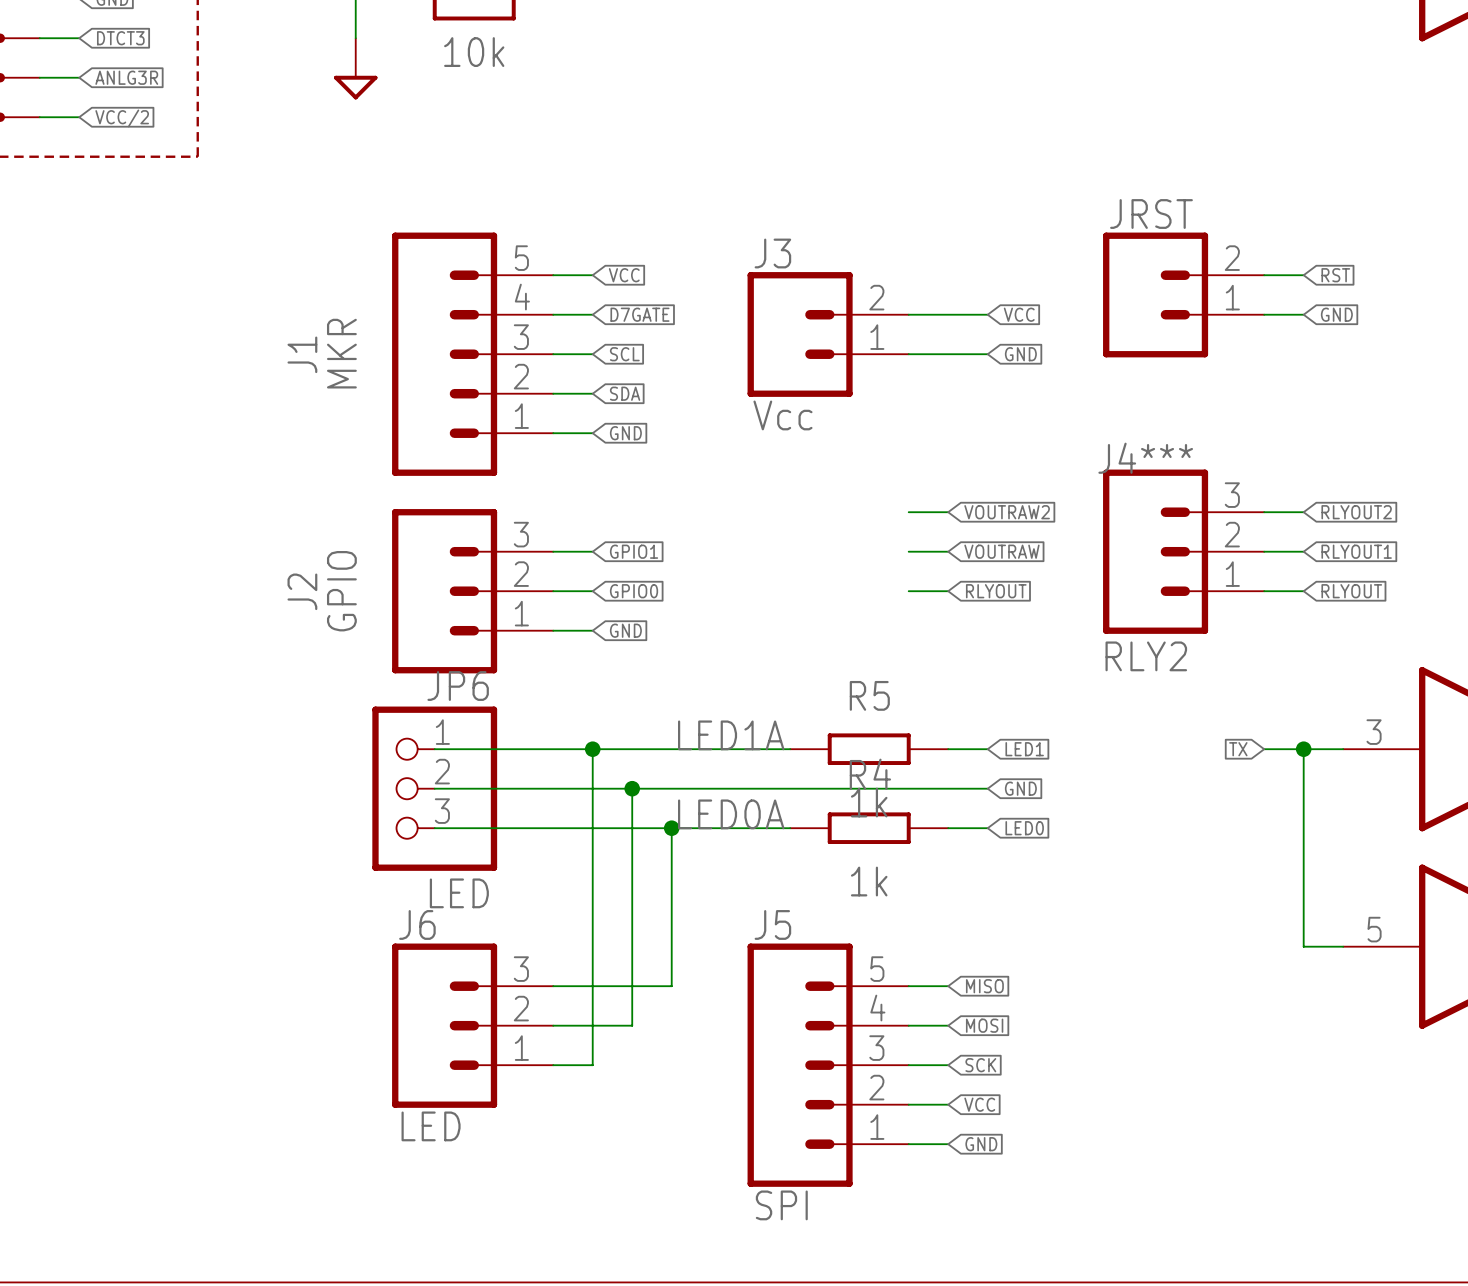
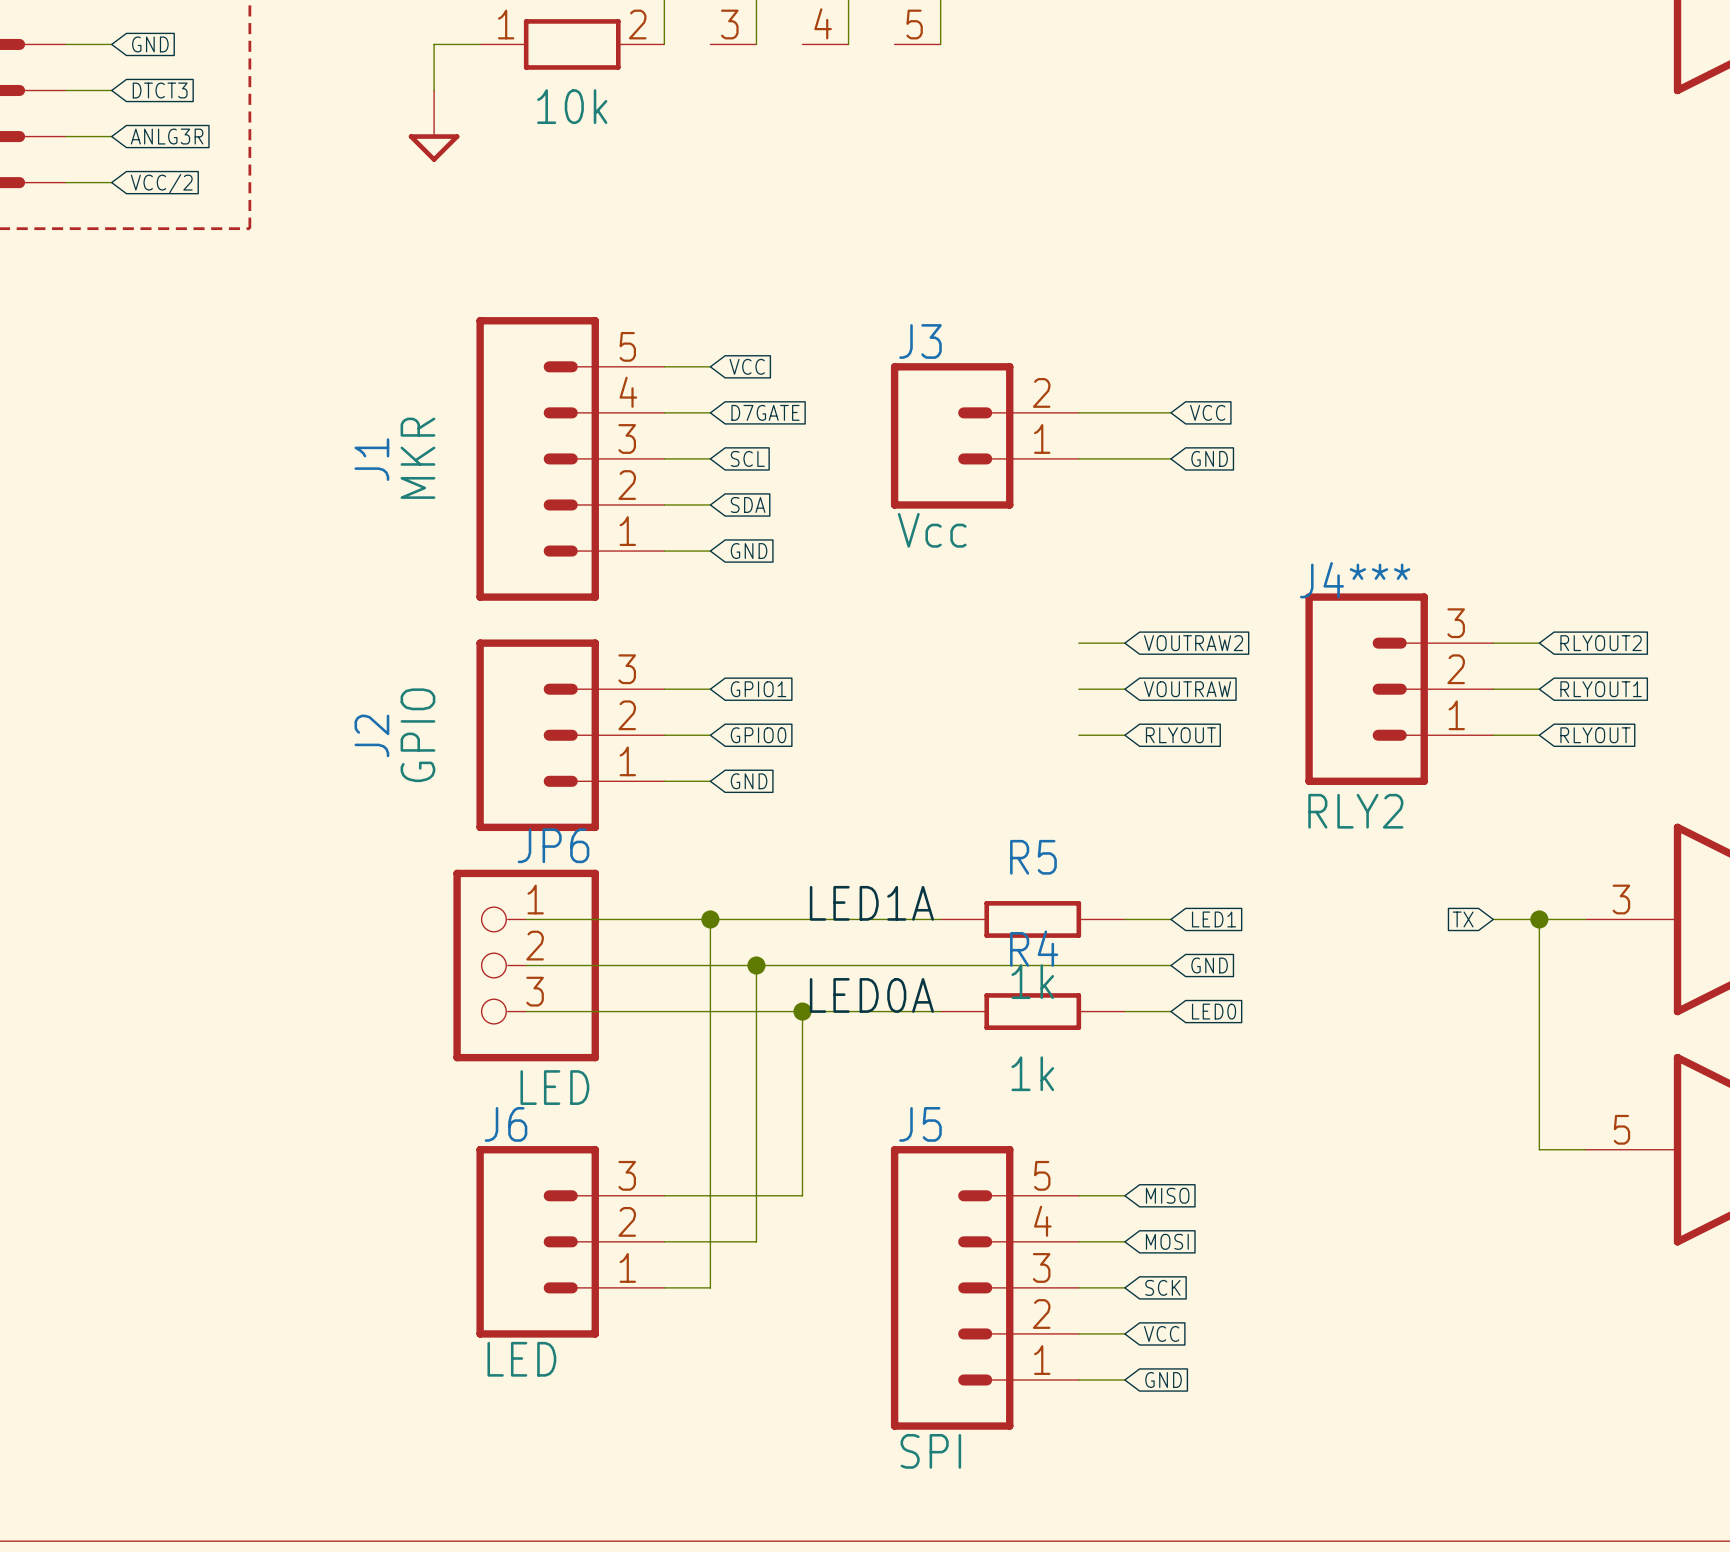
wire: (1264, 275) (1303, 275) -> none
global label: RST (1335, 275) -> none
JRST: (1183, 294) -> none
wire: (1264, 314) (1303, 314) -> none
global label: GND (1336, 314) -> none

